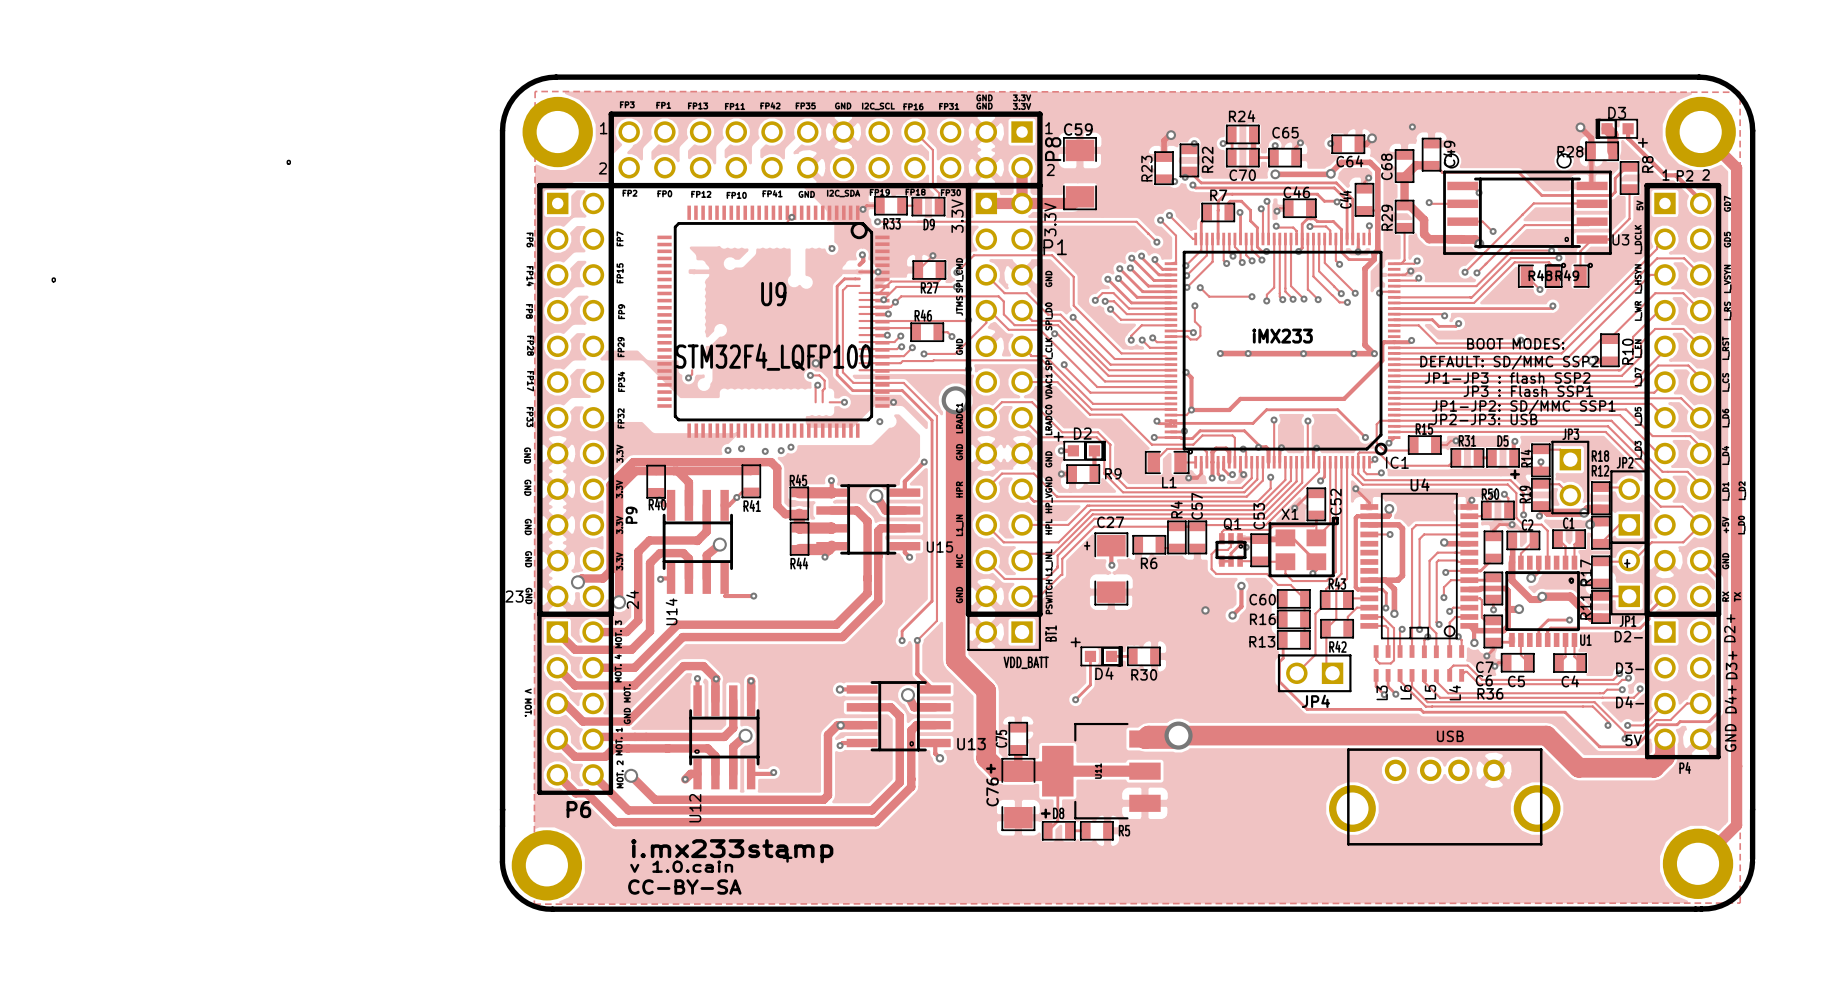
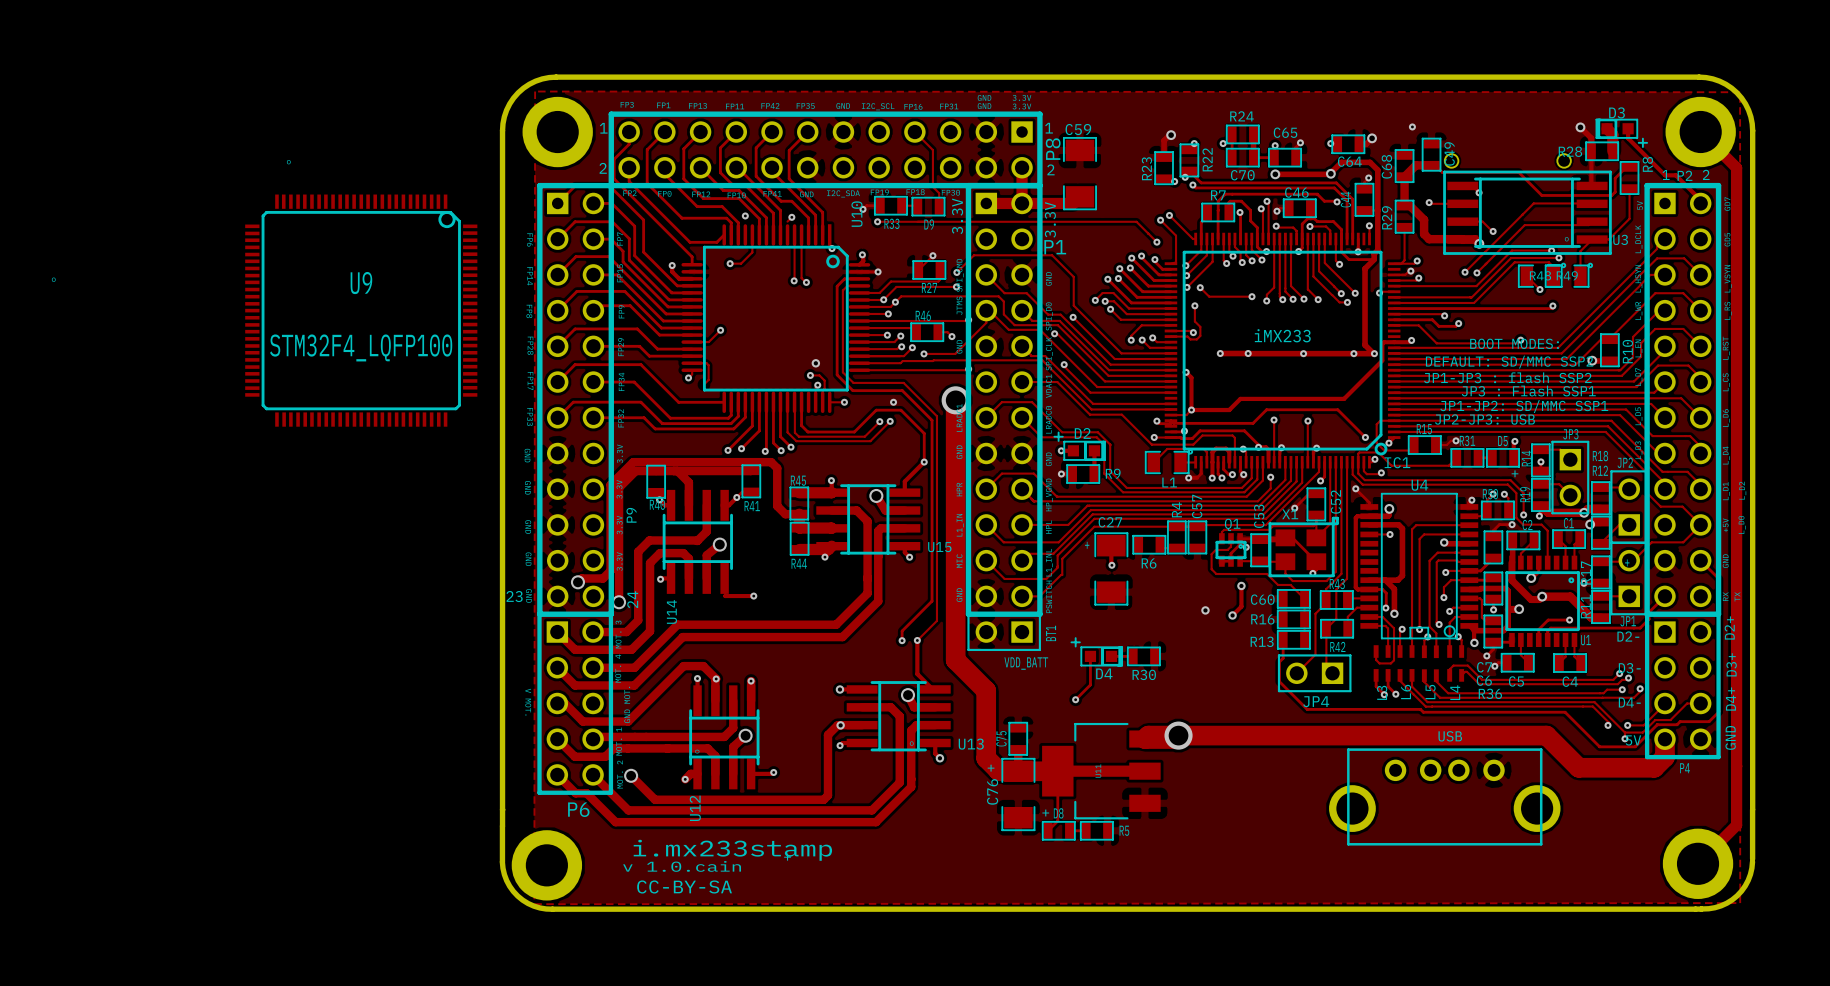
track: none -> (629, 132) (629, 144) (614, 159) (614, 178) (692, 256) (692, 264)
track: none -> (664, 132) (647, 149) (647, 183) (682, 218) (726, 218) (731, 222) (731, 234)
track: none -> (700, 132) (683, 148) (683, 178) (703, 198) (739, 198) (759, 218) (759, 234)
track: none -> (736, 132) (720, 147) (720, 172) (732, 185) (745, 185) (773, 213) (773, 234)
track: none -> (772, 132) (756, 147) (756, 176) (781, 201) (791, 201) (808, 218) (808, 234)
track: none -> (807, 132) (789, 150) (789, 178) (822, 212) (822, 234)
track: none -> (629, 167) (629, 181) (690, 242) (716, 242) (724, 234)
track: none -> (664, 167) (664, 174) (697, 206) (722, 206) (738, 222) (738, 234)
track: none -> (700, 167) (723, 190) (739, 190) (766, 217) (766, 234)
track: none -> (736, 167) (780, 210) (780, 234)
track: none -> (772, 167) (772, 171) (815, 215) (815, 234)
track: none -> (557, 203) (575, 186) (609, 186) (643, 220) (643, 252) (677, 285) (692, 285)
track: none -> (593, 203) (611, 203) (634, 226) (634, 255) (671, 292) (692, 292)
via: none -> (745, 215)
track: none -> (752, 234) (752, 252) (741, 263) (730, 263)
track: none -> (794, 234) (794, 280)
track: none -> (801, 234) (801, 278) (806, 282)
track: none -> (557, 239) (575, 221) (612, 221) (629, 238) (629, 260) (669, 299) (692, 299)
track: none -> (593, 239) (611, 239) (623, 251) (623, 261) (668, 306) (692, 306)
via: none -> (730, 263)
track: none -> (672, 265) (672, 271) (679, 278) (692, 278)
via: none -> (672, 265)
track: none -> (557, 274) (576, 256) (608, 256) (666, 313) (692, 313)
track: none -> (593, 274) (617, 274) (663, 321) (692, 321)
via: none -> (794, 280)
via: none -> (806, 282)
track: none -> (557, 310) (576, 291) (624, 291) (661, 328) (692, 328)
track: none -> (593, 310) (598, 305) (630, 305) (659, 335) (692, 335)
U10: none -> (775, 318)
U9 position: (773, 321) -> (361, 310)
track: none -> (720, 330) (708, 342) (692, 342)
via: none -> (720, 330)
track: none -> (557, 346) (575, 328) (637, 328) (657, 349) (692, 349)
track: none -> (593, 346) (639, 346) (649, 356) (692, 356)
track: none -> (692, 363) (706, 363) (708, 365) (708, 379) (703, 384)
track: none -> (557, 382) (575, 364) (640, 364) (678, 402) (724, 402)
track: none -> (593, 382) (634, 382) (670, 418) (728, 418) (731, 415) (731, 402)
track: none -> (738, 402) (738, 416) (731, 423) (662, 423) (640, 402) (573, 402) (557, 417)
track: none -> (745, 402) (745, 417) (733, 428) (655, 428) (644, 417) (593, 417)
track: none -> (752, 402) (752, 426) (728, 450)
track: none -> (759, 402) (759, 430) (741, 448)
track: none -> (766, 402) (766, 450)
track: none -> (773, 402) (773, 442) (781, 450)
track: none -> (780, 402) (780, 436) (790, 447)
track: none -> (787, 402) (787, 432) (796, 441) (870, 441) (890, 421)
track: none -> (794, 402) (794, 432) (798, 436) (864, 436) (879, 421)
track: none -> (801, 402) (801, 425) (807, 432) (854, 432) (876, 410) (900, 410) (924, 433) (924, 462)
via: none -> (890, 421)

